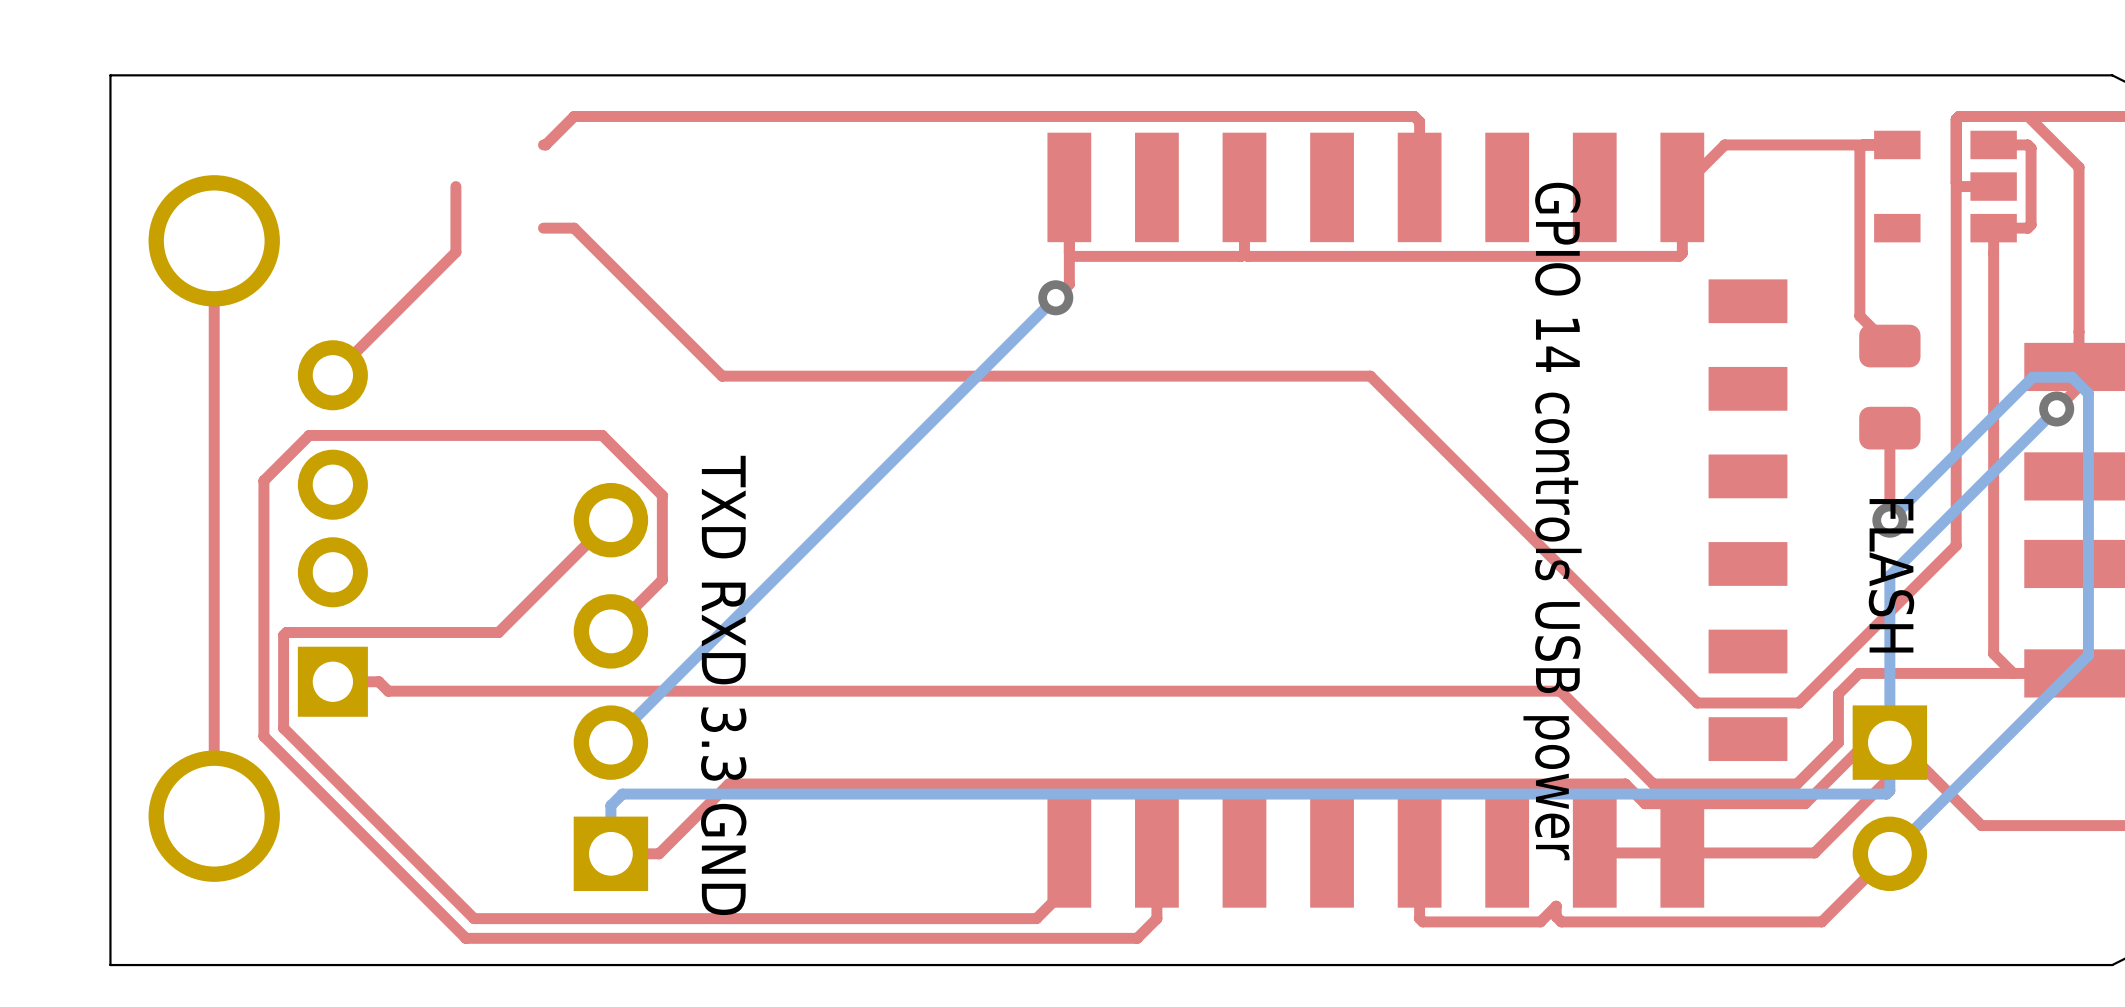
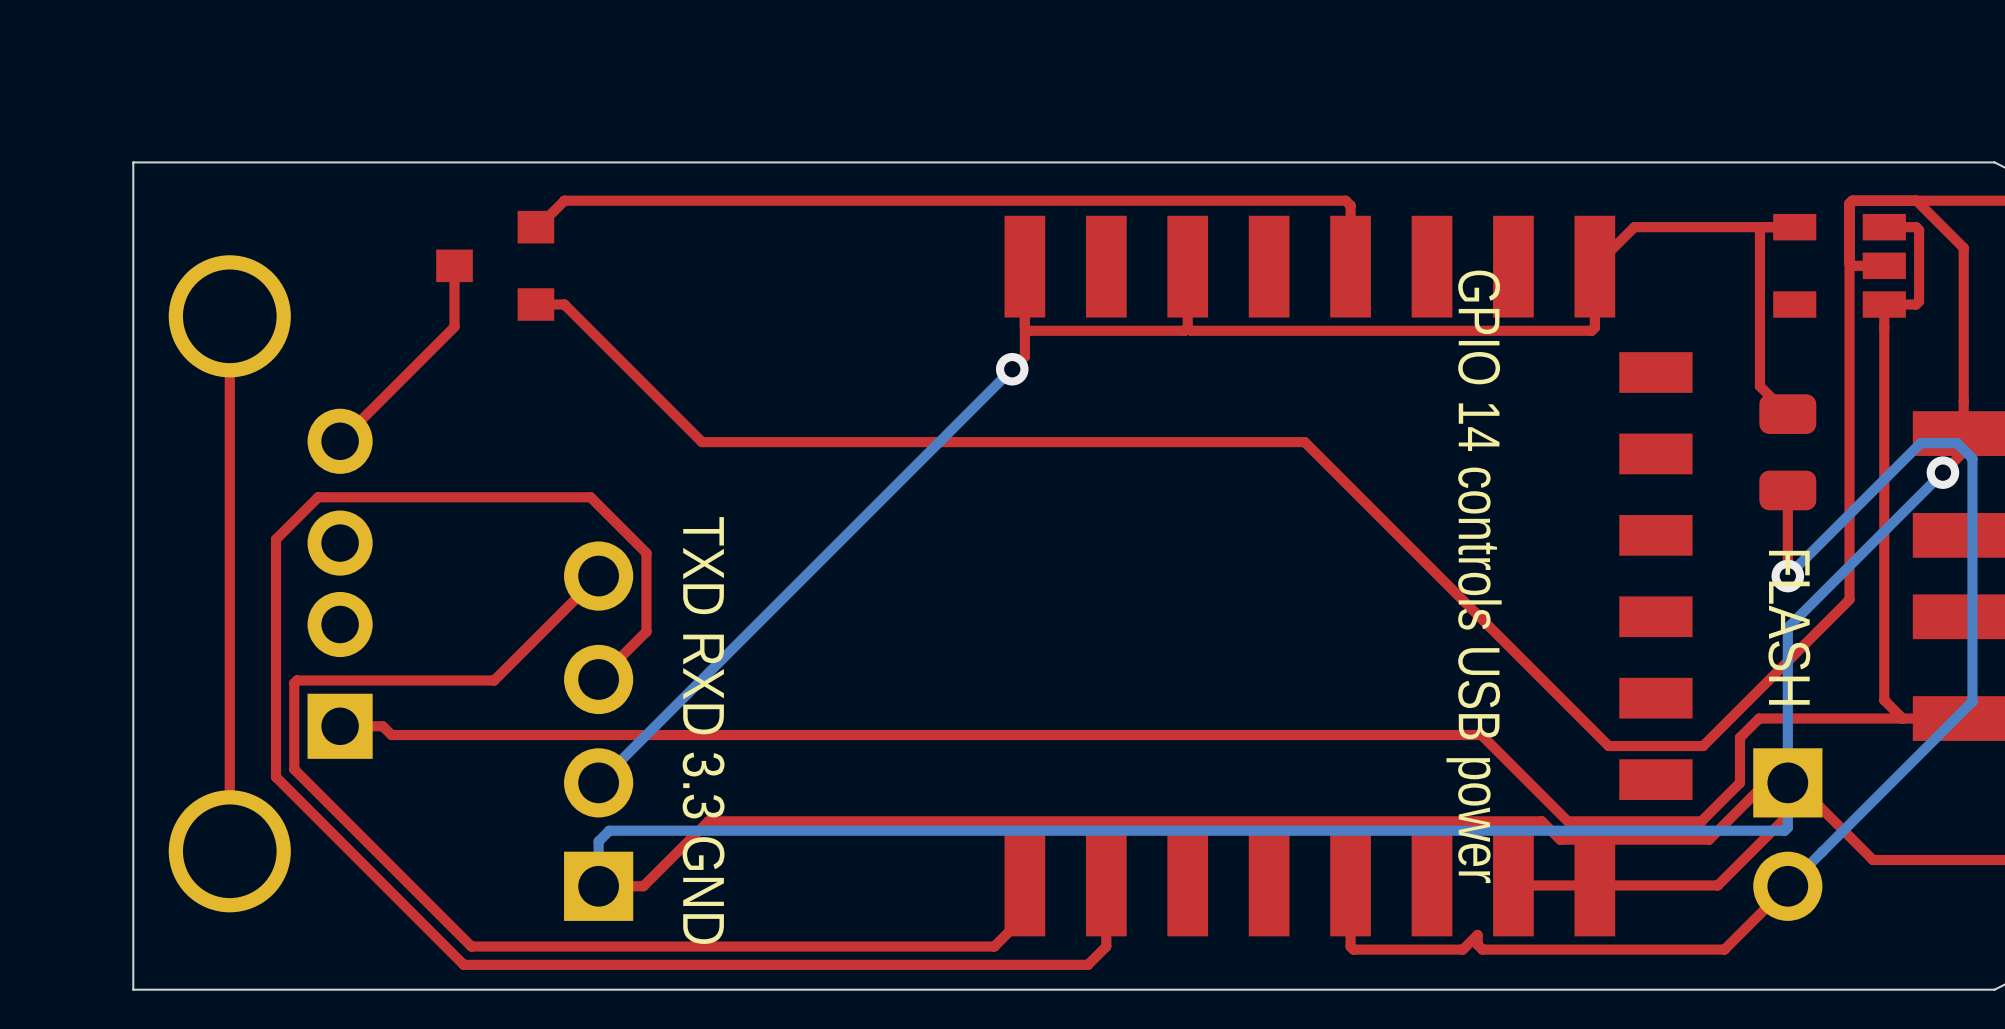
part: none -> (495, 265)

